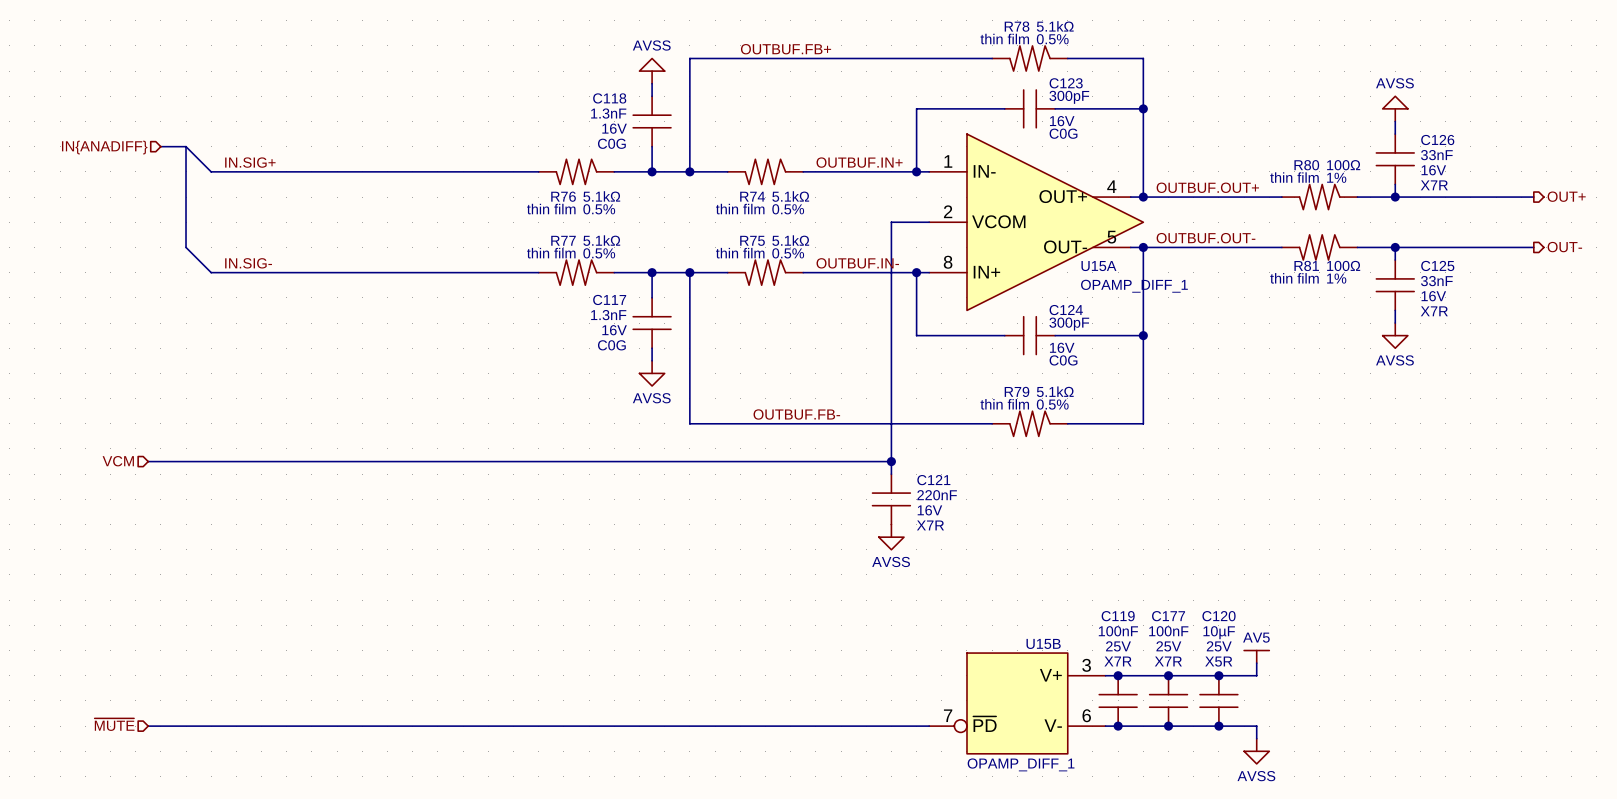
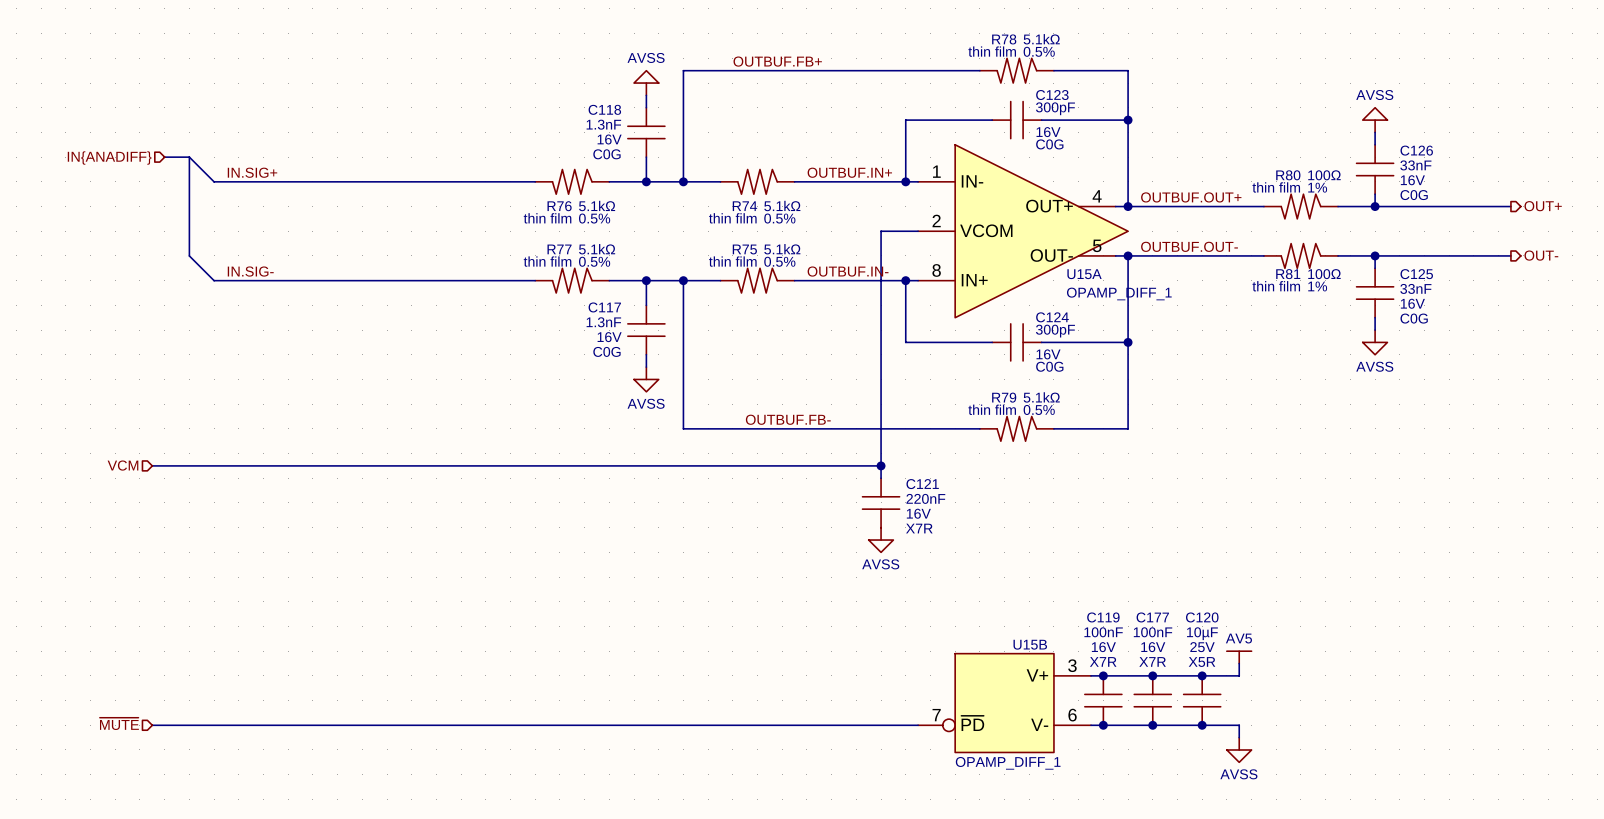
C126 text: X7R (1434, 185) -> C0G (1414, 195)
C125 text: X7R (1434, 311) -> C0G (1414, 318)
C119 text: 25V (1118, 646) -> 16V (1103, 647)
C177 text: 25V (1168, 646) -> 16V (1153, 647)

